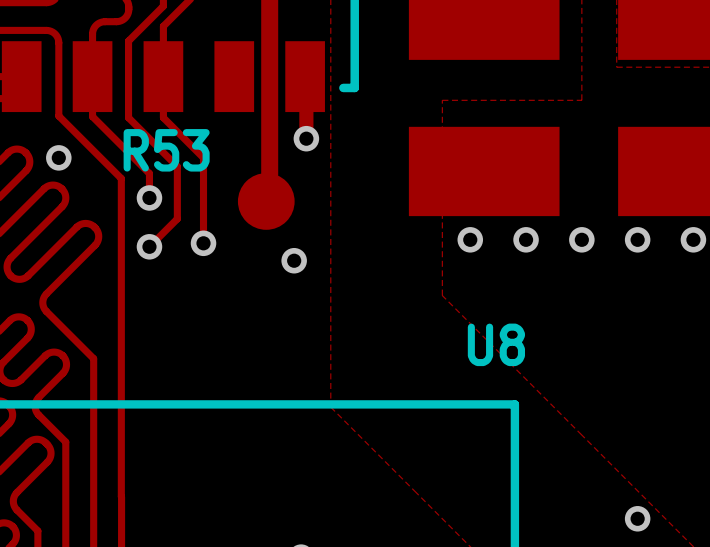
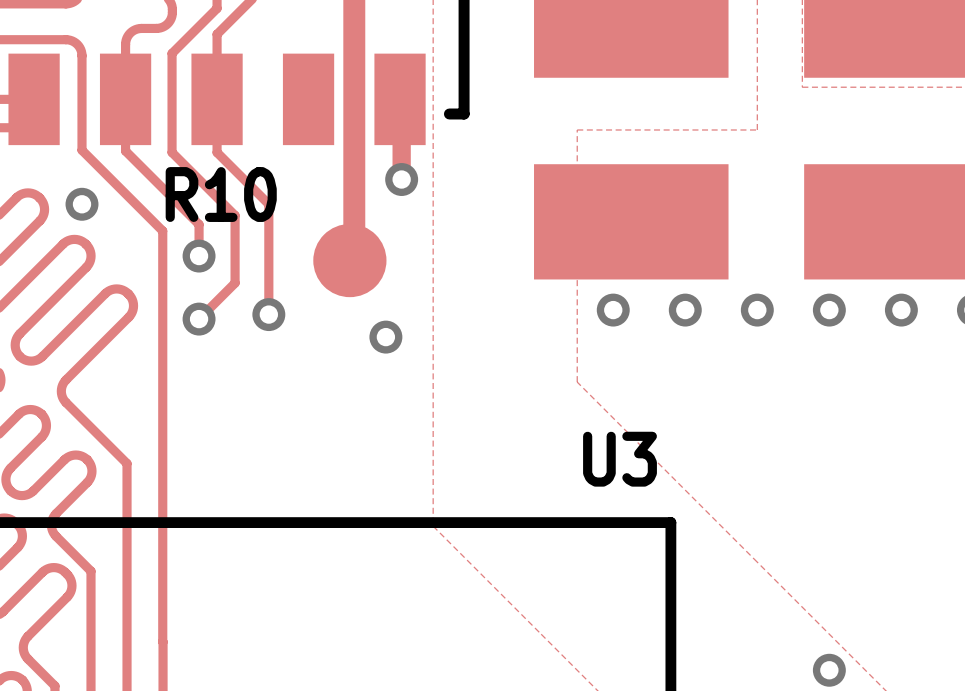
R53 name: R53 (166, 150) -> R10 (221, 194)
U8 name: U8 (496, 344) -> U3 (620, 459)

